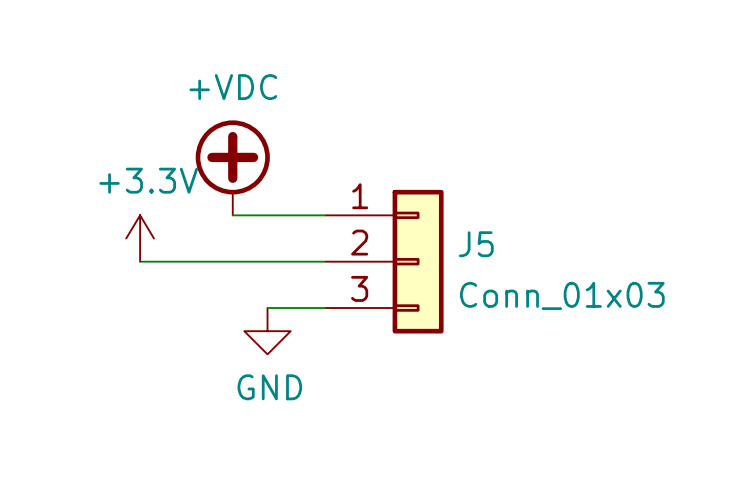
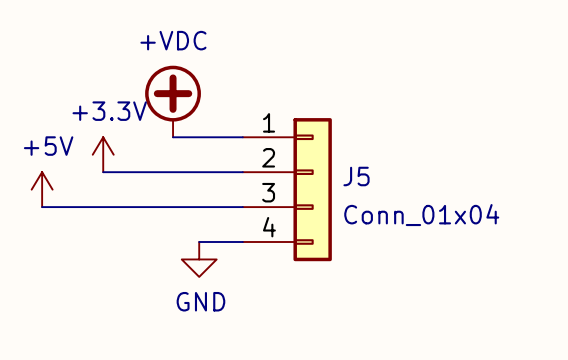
J5 symbol: [325, 189, 444, 334] -> [242, 118, 332, 262]
power symbol: none -> +5V (42, 189)
J5 value: Conn_01x03 (562, 295) -> Conn_01x04 (421, 215)
wire: none -> (42, 207) (199, 207)
power symbol position: GND (267, 331) -> GND (199, 259)
wire: none -> (199, 242) (242, 242)

